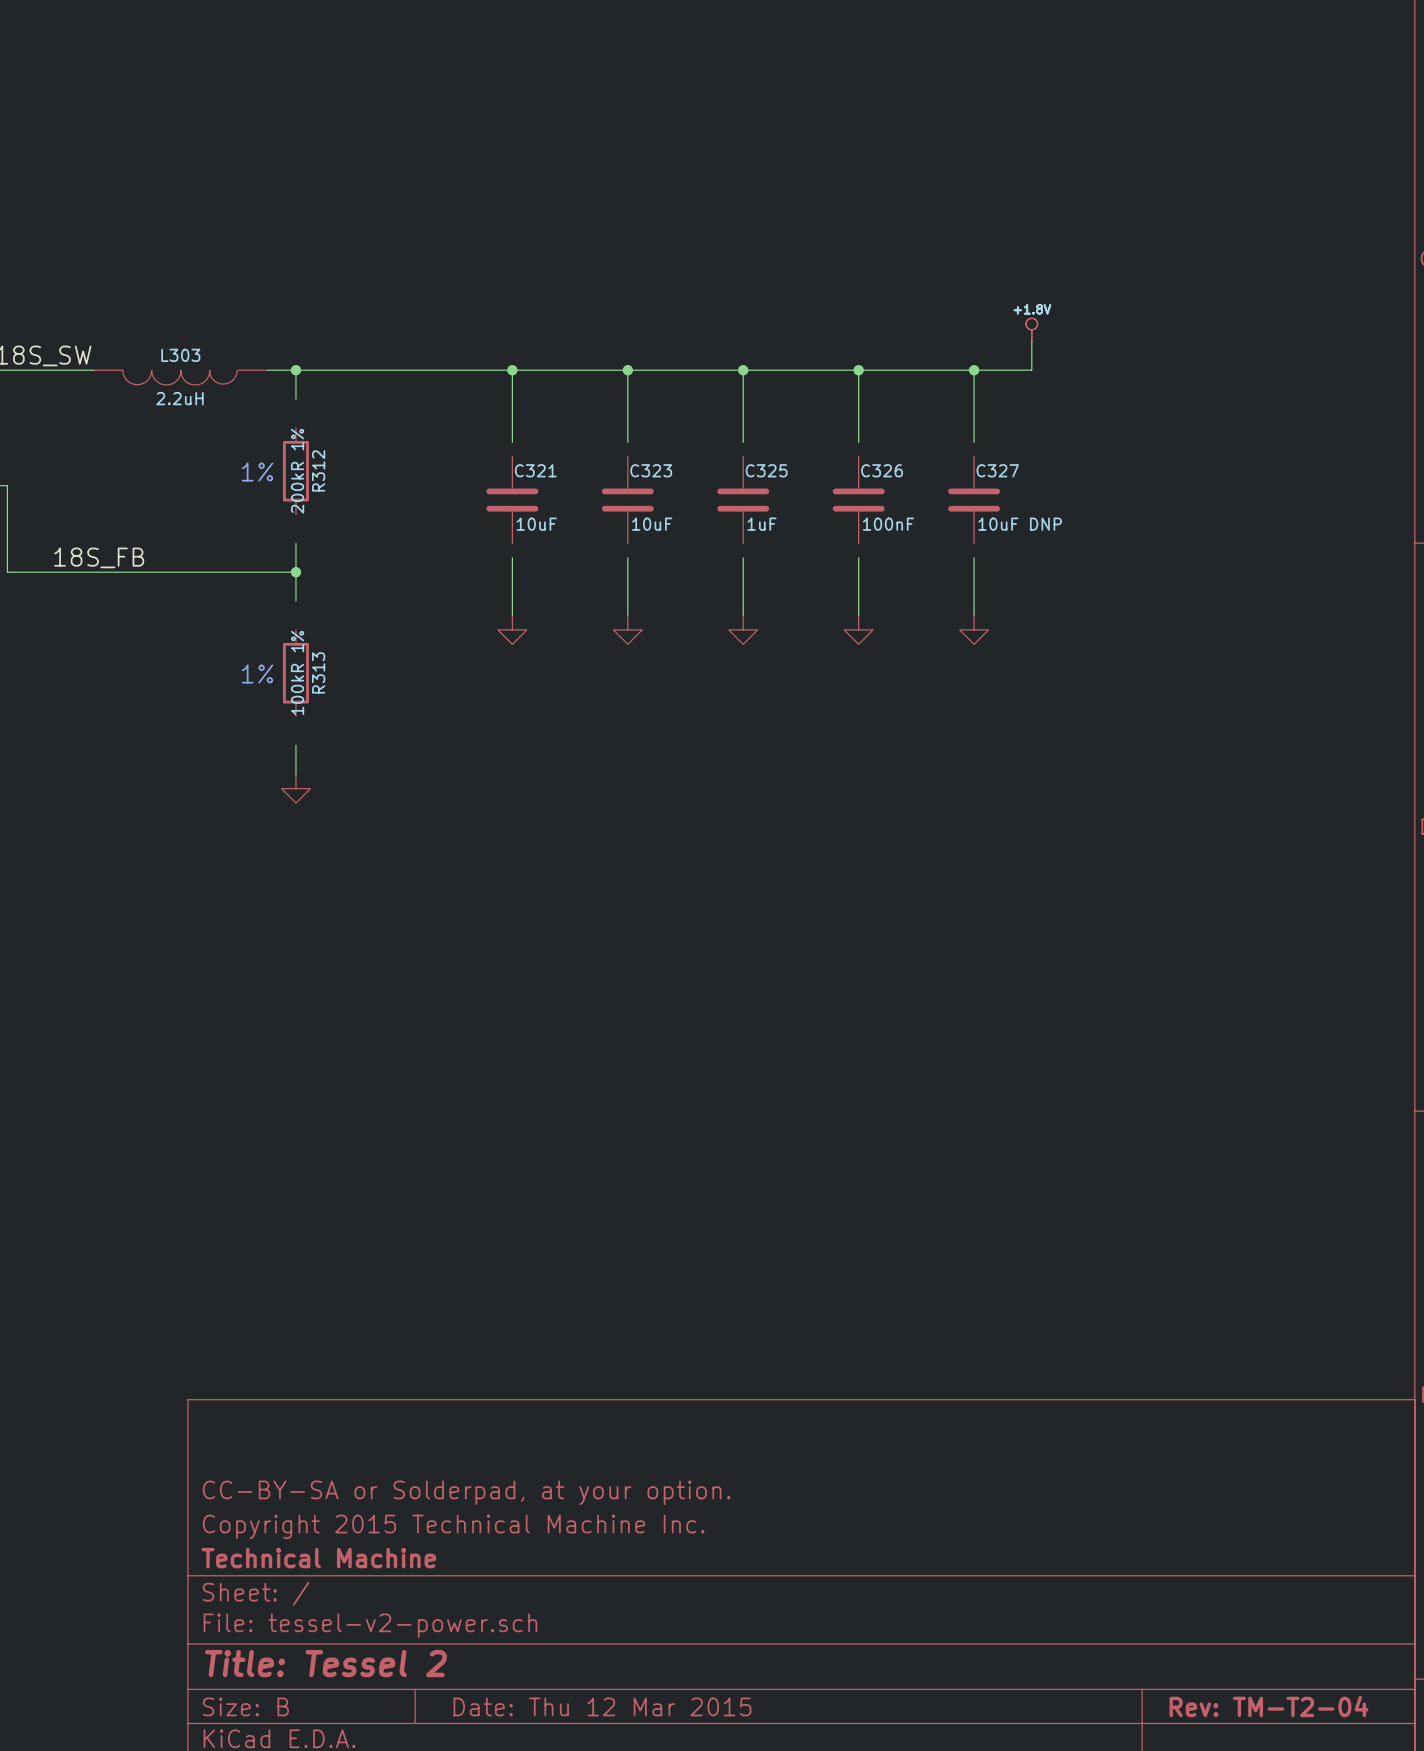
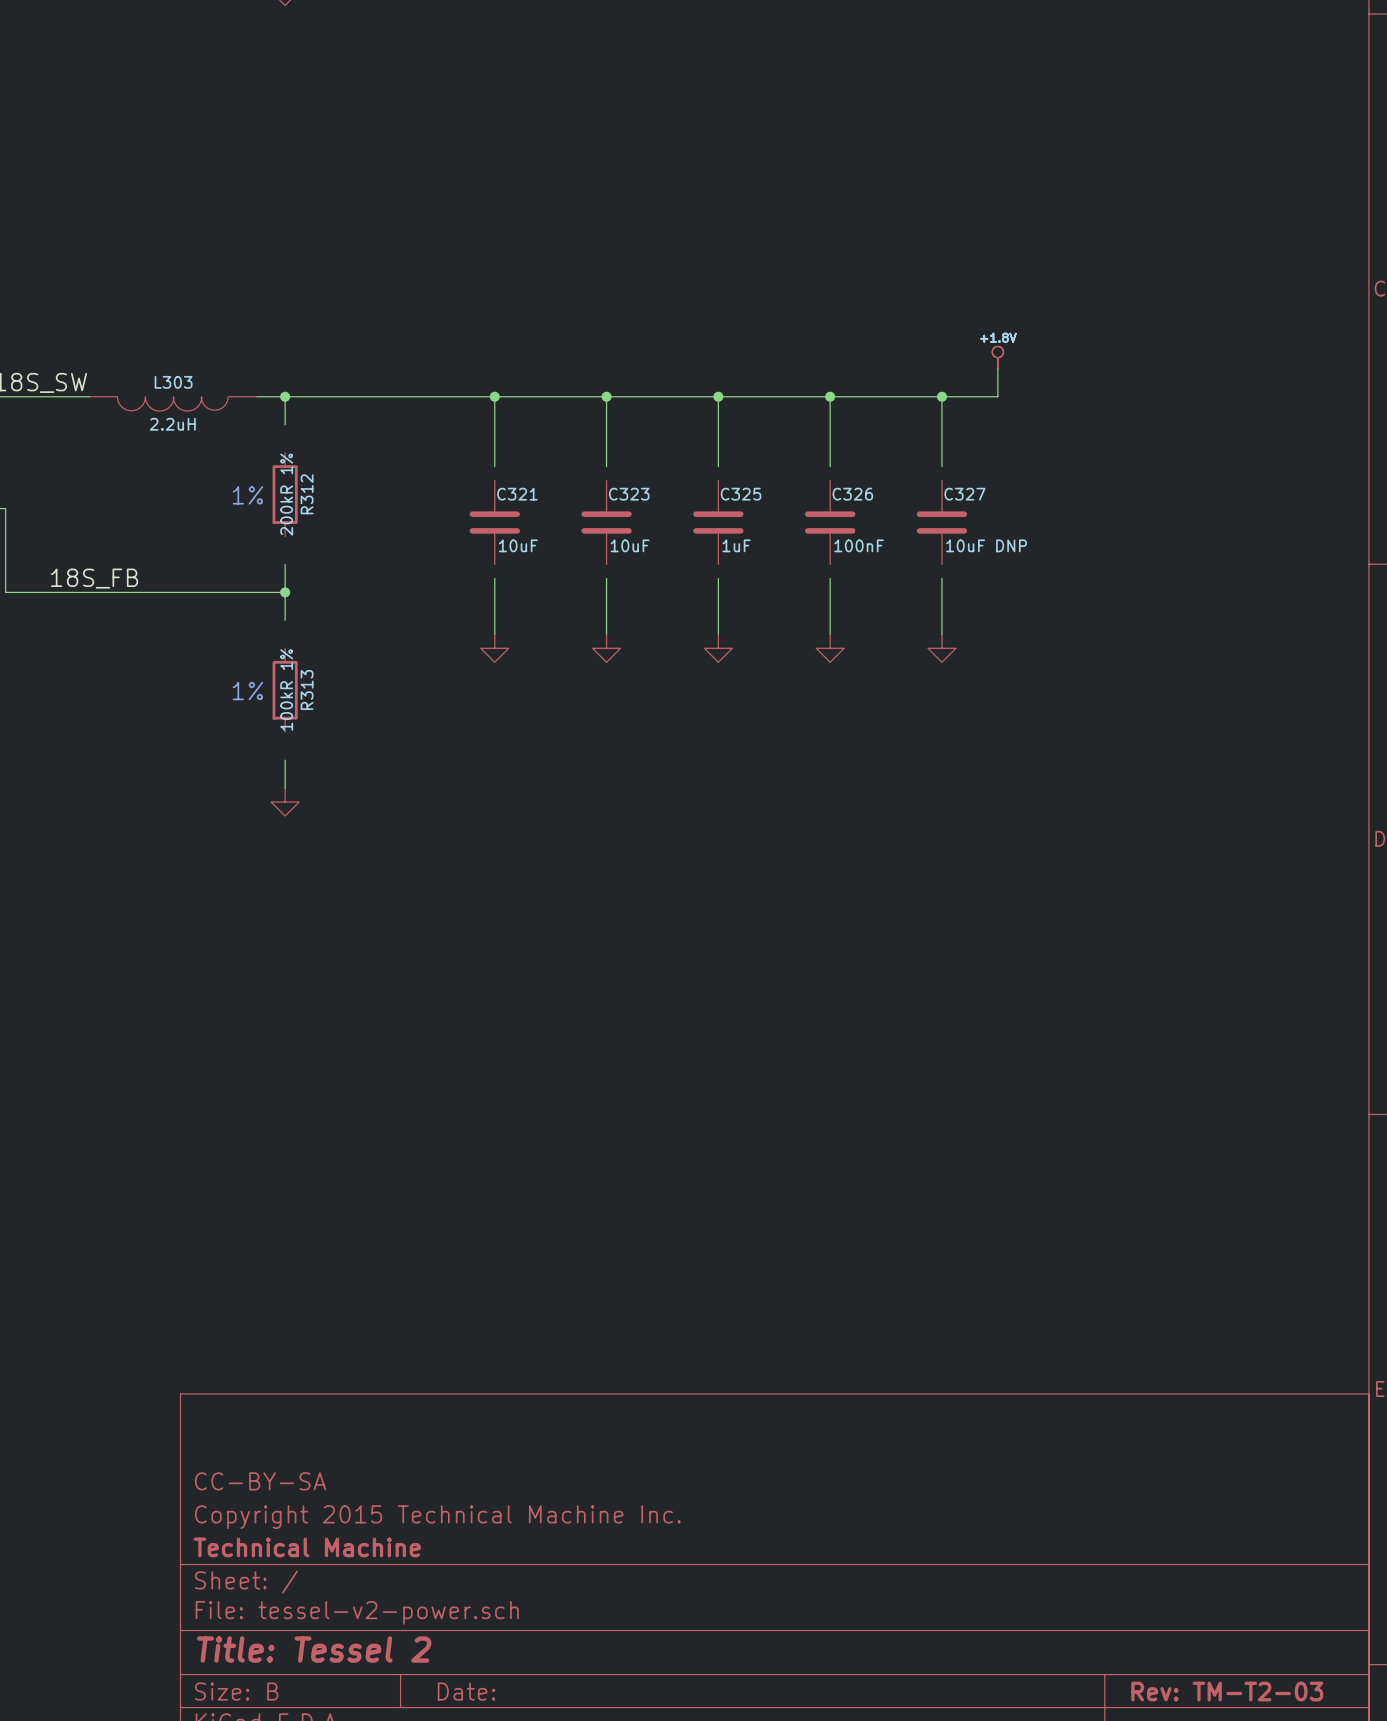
title block: CC-BY-SA or Solderpad, at your option. (466, 1492) -> CC-BY-SA (260, 1481)
title block: Date: Thu 12 Mar 2015 (602, 1706) -> Date: (466, 1691)
title block: Rev: TM-T2-04 (1269, 1706) -> Rev: TM-T2-03 (1227, 1691)

